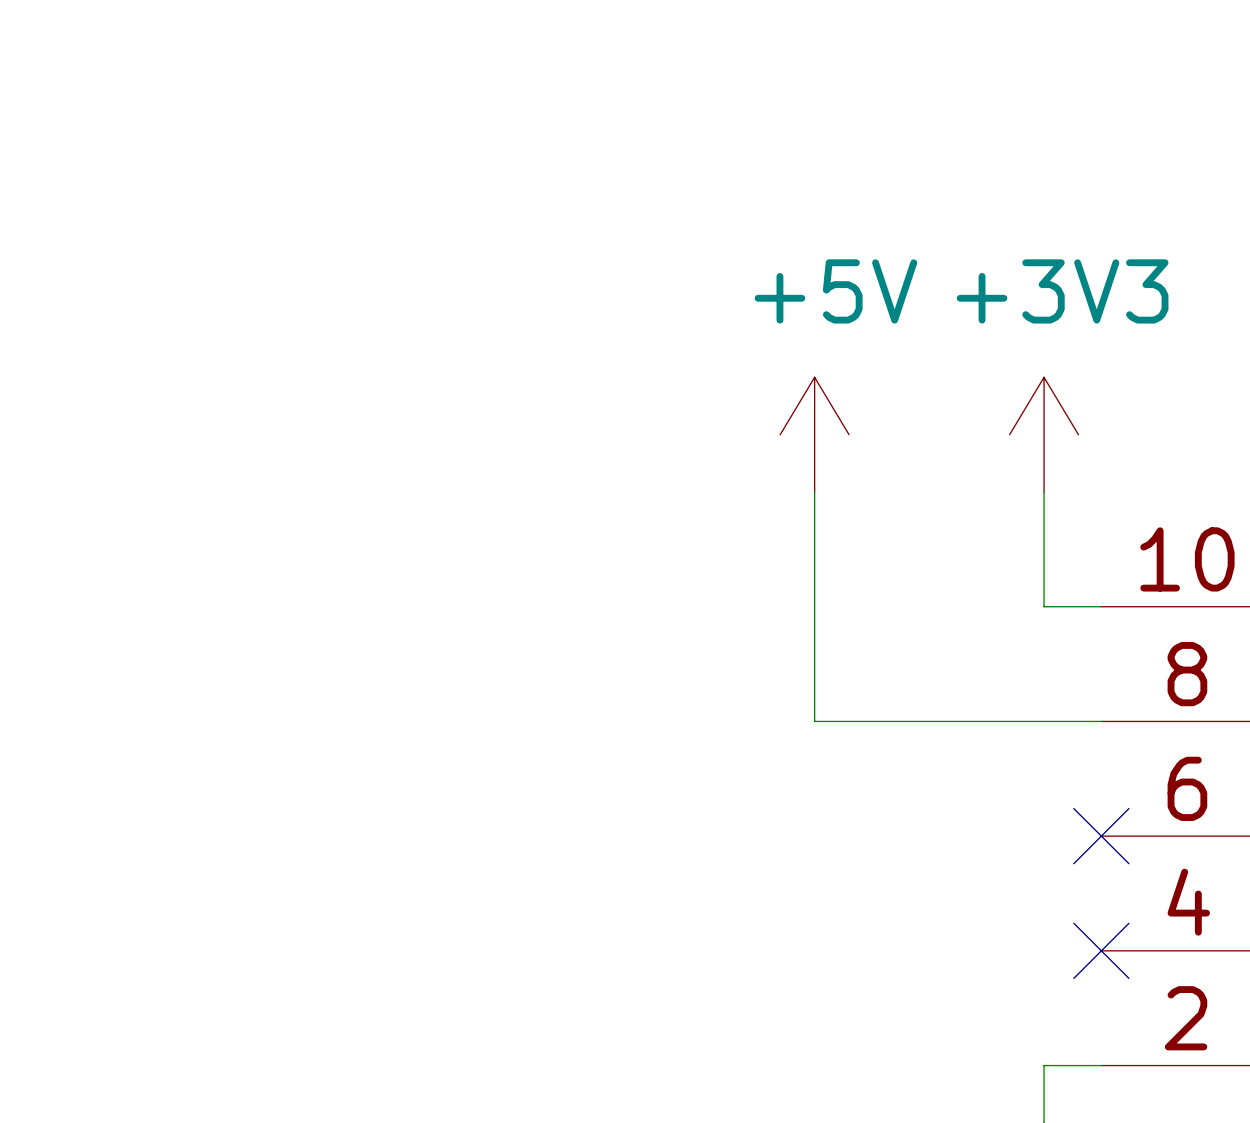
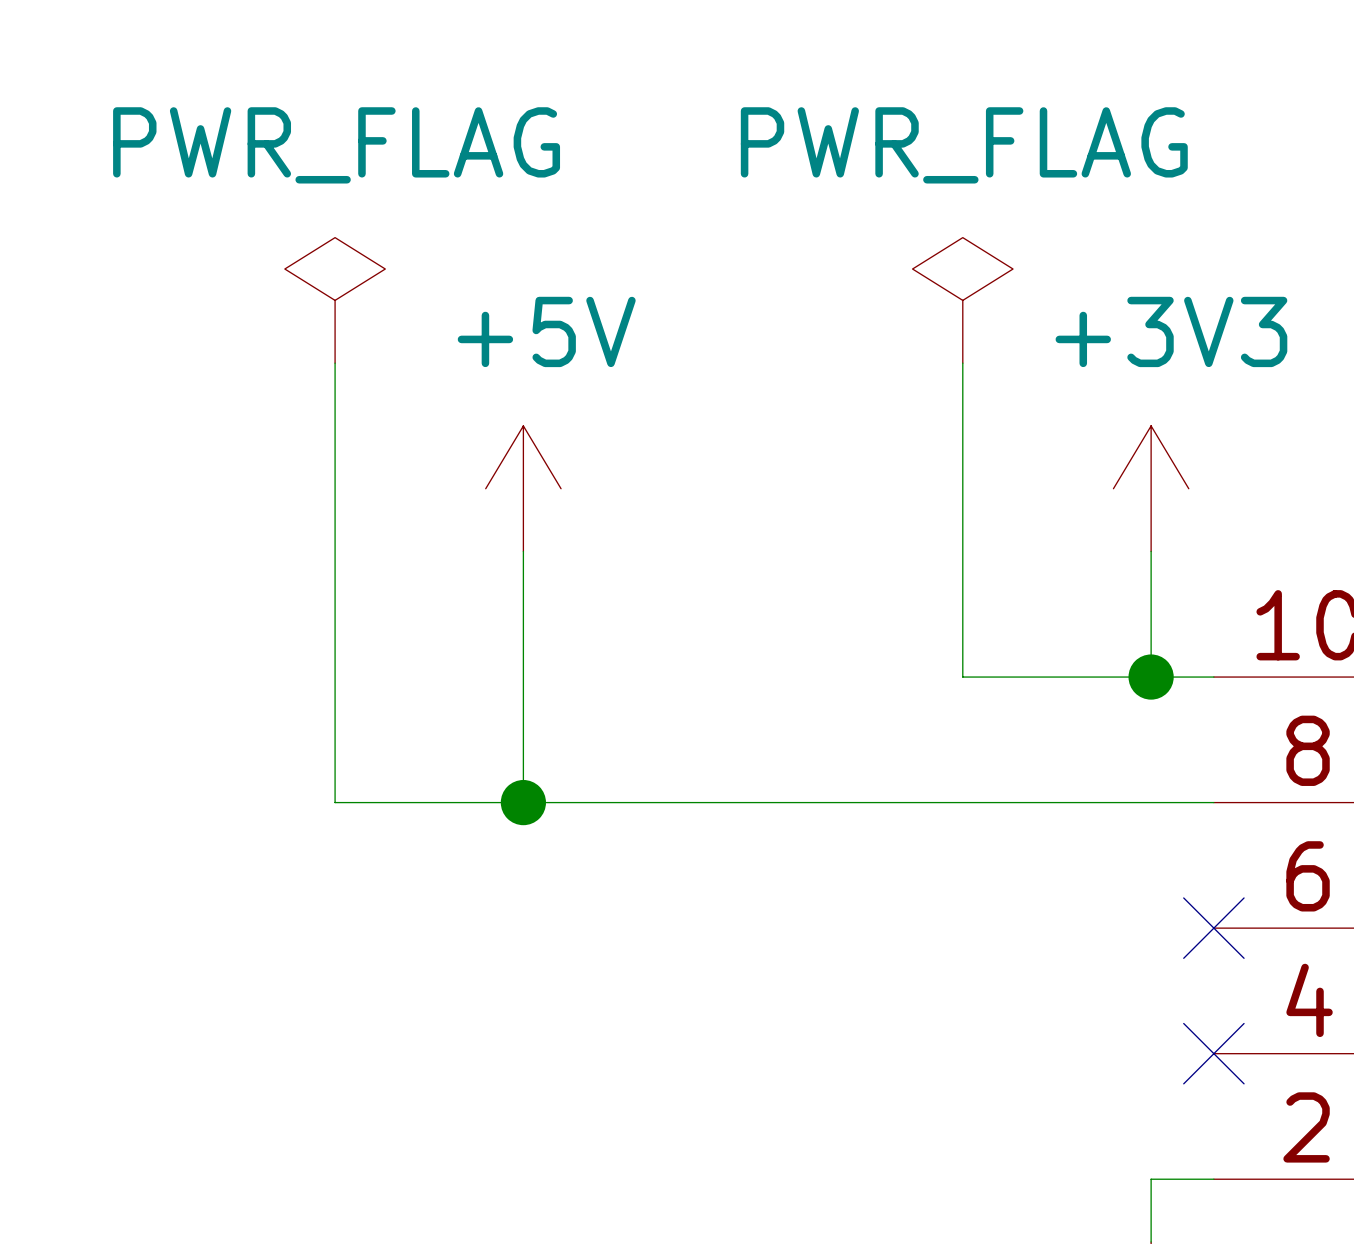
power symbol: none -> PWR_FLAG (335, 300)
power symbol: none -> PWR_FLAG (962, 300)
wire: none -> (962, 363) (962, 677) (1151, 677)
power symbol position: +5V (814, 434) -> +5V (523, 488)
wire: none -> (523, 551) (523, 802)
wire: (814, 492) (814, 721) -> (335, 363) (335, 802) (900, 802)
junction: none -> (1151, 677)
junction: none -> (523, 802)

